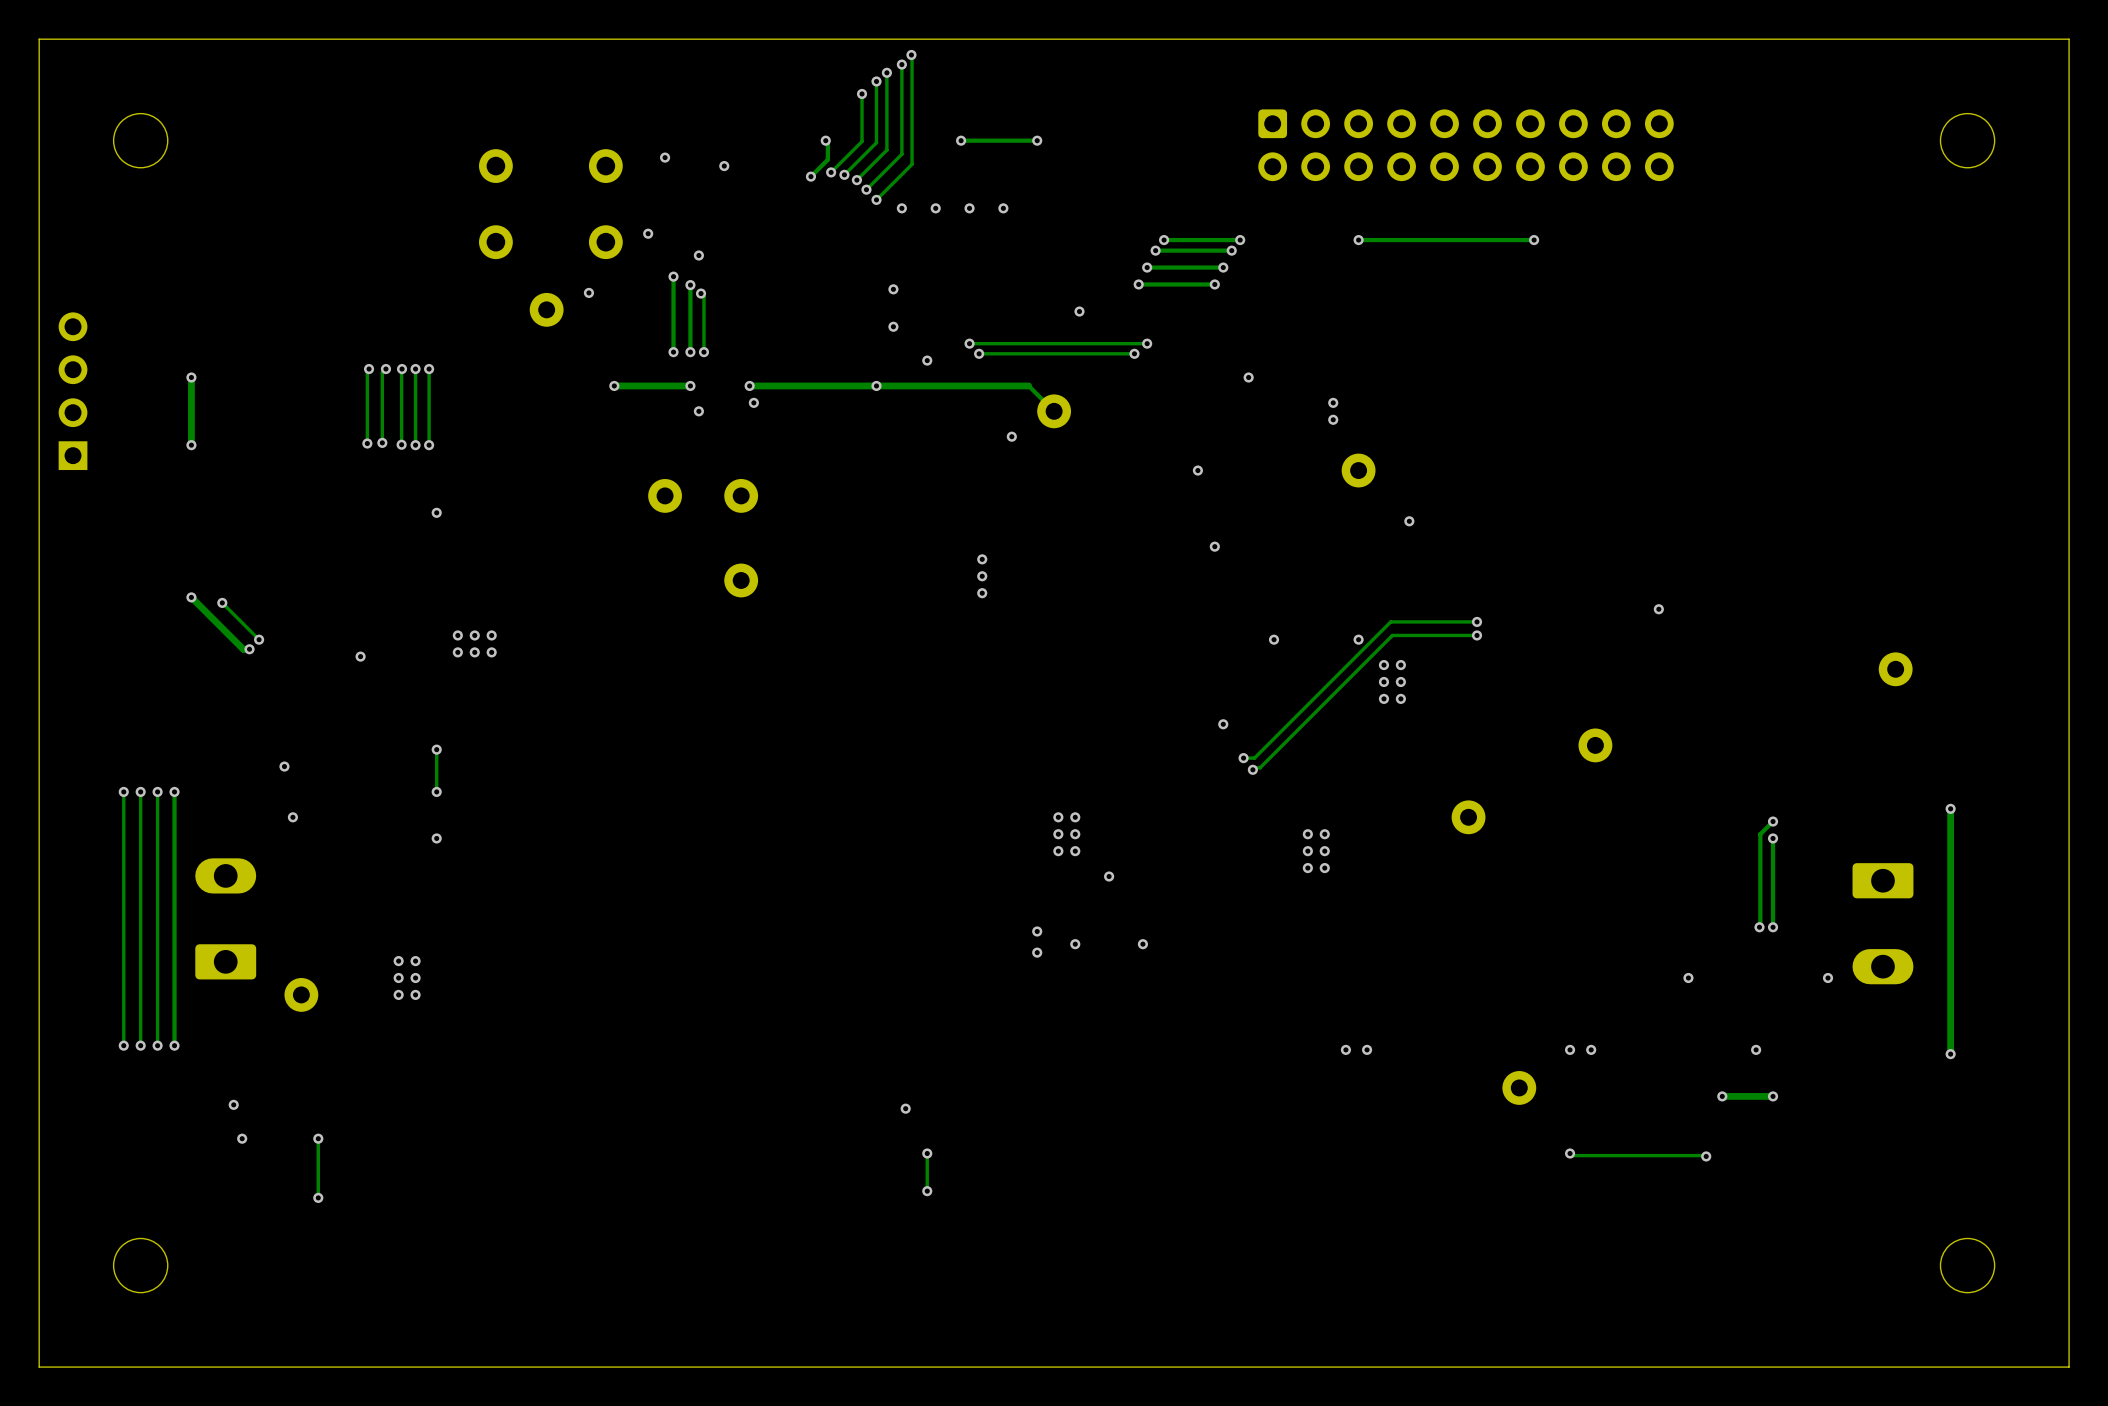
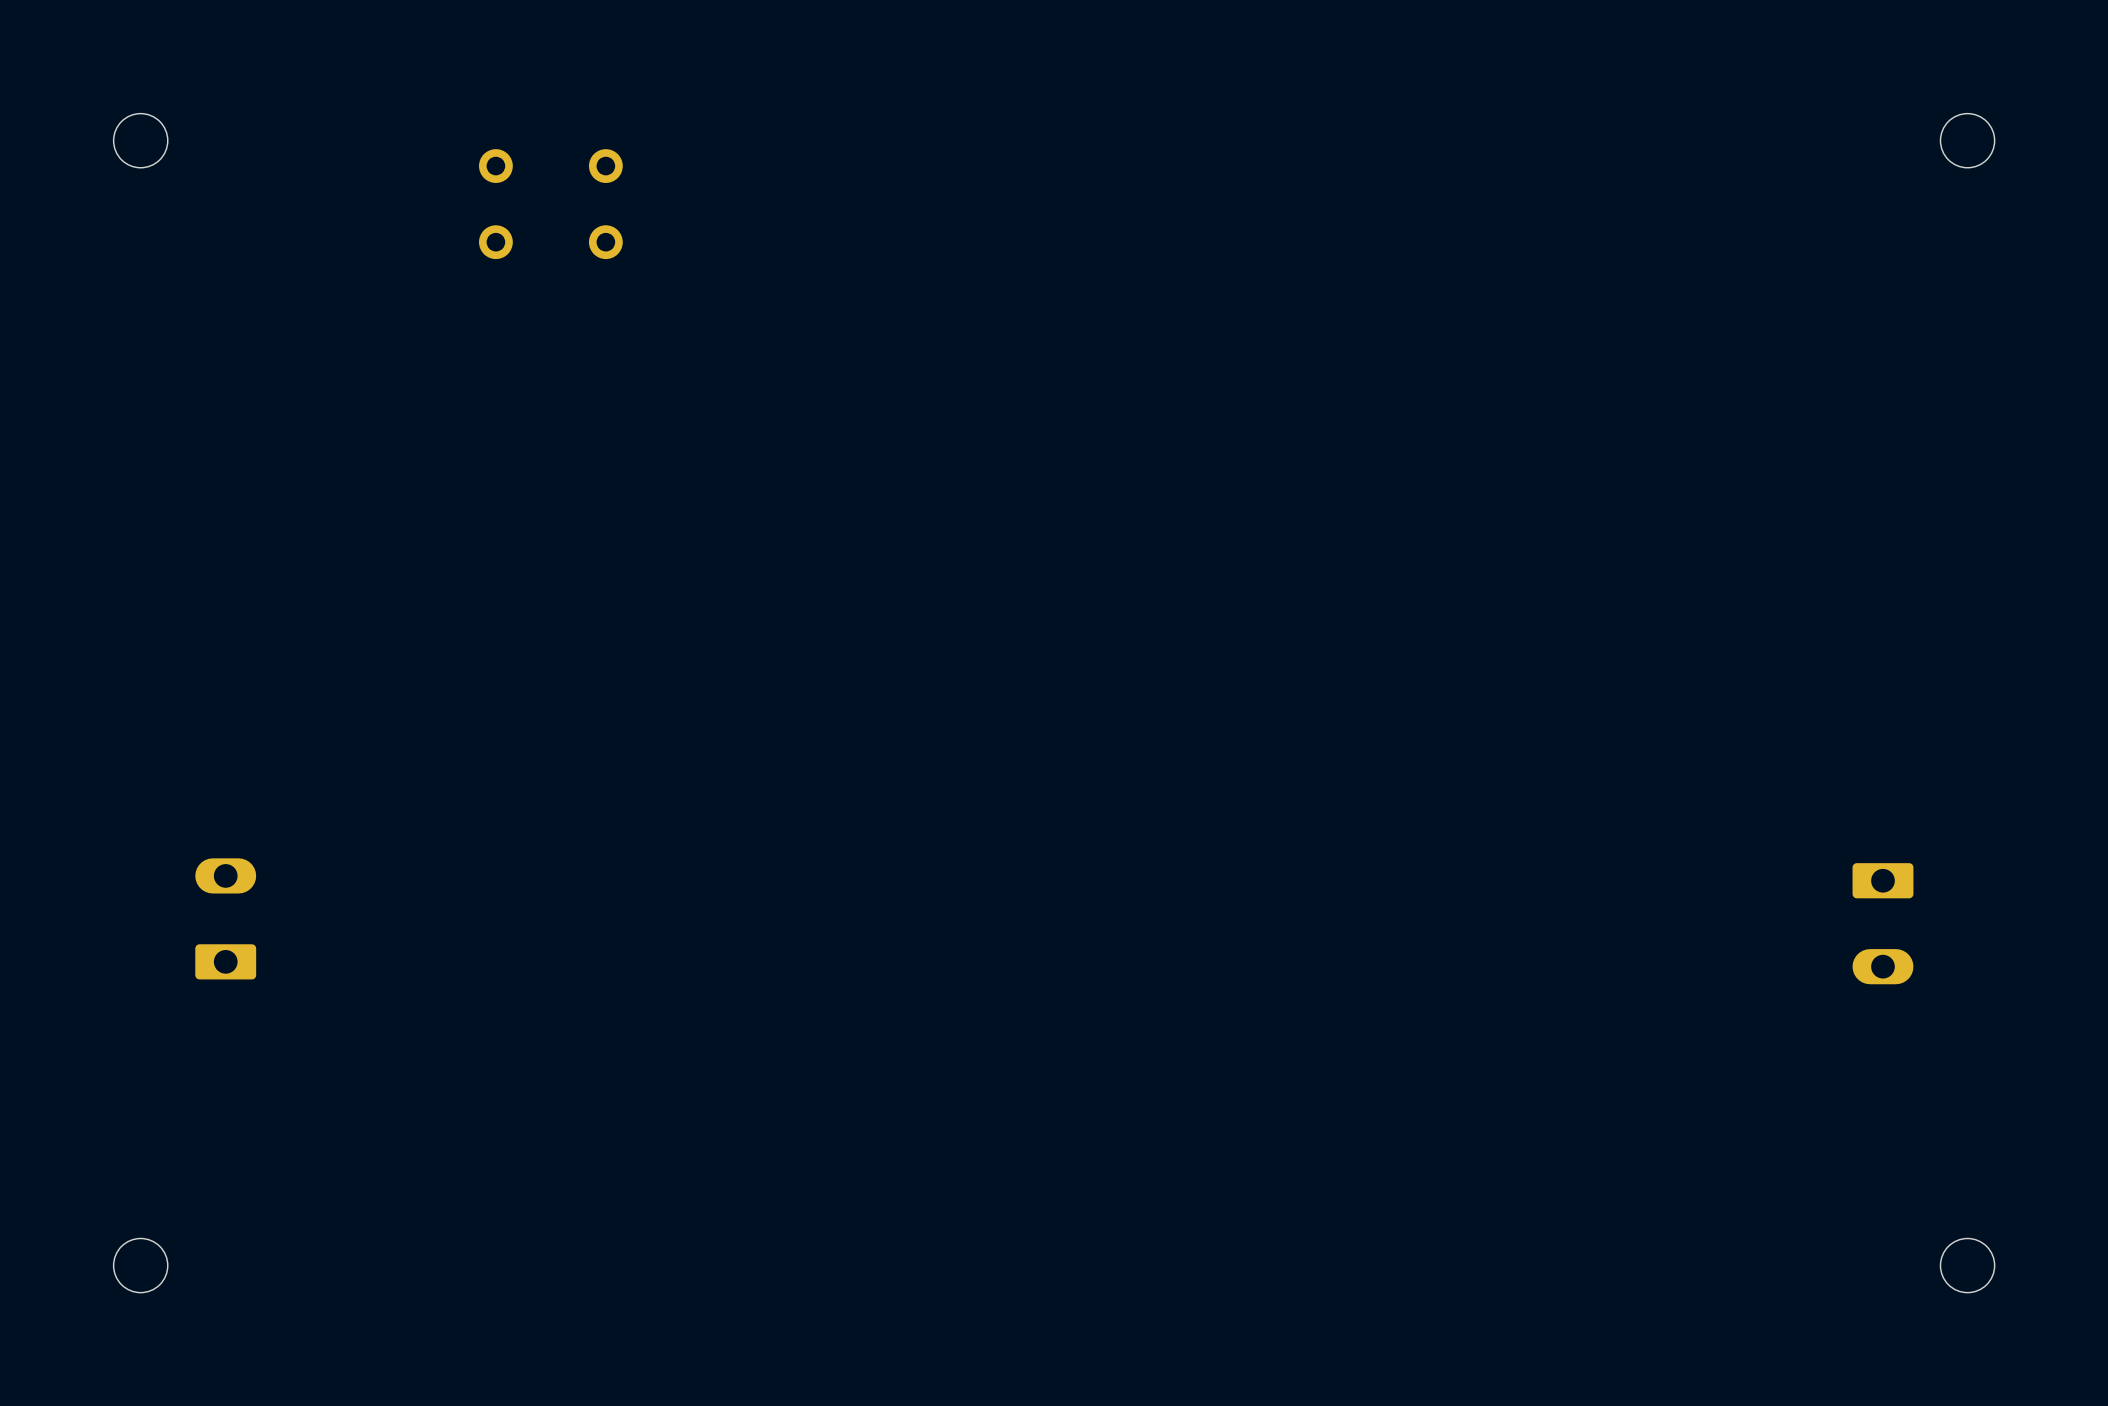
board edge: (2069, 39) (39, 39) (39, 1367) (2069, 1367) (2069, 39) -> none
track: (911, 54) (912, 164) (876, 199) -> none
via: (911, 54) -> none
track: (901, 64) (901, 154) (866, 189) -> none
via: (901, 64) -> none
via: (886, 72) -> none
track: (886, 73) (886, 150) (856, 180) -> none
track: (876, 81) (876, 142) (844, 174) -> none
via: (876, 81) -> none
track: (862, 93) (862, 141) (831, 172) -> none
via: (862, 93) -> none
track: (825, 140) (827, 142) (827, 159) (810, 176) -> none
via: (825, 140) -> none
via: (961, 140) -> none
track: (1037, 140) (961, 140) -> none
via: (1037, 140) -> none
part: (1466, 145) -> none
via: (665, 157) -> none
via: (724, 166) -> none
via: (831, 172) -> none
via: (844, 174) -> none
via: (810, 176) -> none
via: (856, 180) -> none
via: (866, 189) -> none
via: (876, 199) -> none
via: (901, 208) -> none
via: (935, 208) -> none
via: (969, 208) -> none
via: (1003, 208) -> none
via: (648, 233) -> none
via: (1164, 240) -> none
track: (1240, 240) (1164, 240) -> none
via: (1240, 240) -> none
via: (1358, 240) -> none
track: (1534, 240) (1358, 240) -> none
via: (1534, 240) -> none
via: (1155, 250) -> none
track: (1231, 250) (1155, 250) -> none
via: (1231, 250) -> none
via: (698, 255) -> none
via: (1147, 267) -> none
track: (1223, 267) (1147, 267) -> none
via: (1223, 267) -> none
track: (673, 276) (673, 352) -> none
via: (673, 276) -> none
via: (1138, 284) -> none
track: (1214, 284) (1138, 284) -> none
via: (1214, 284) -> none
track: (690, 285) (690, 352) -> none
via: (690, 285) -> none
via: (893, 289) -> none
via: (588, 292) -> none
track: (701, 293) (703, 296) (703, 352) -> none
via: (701, 293) -> none
part: (546, 309) -> none
via: (1079, 311) -> none
via: (893, 326) -> none
via: (969, 343) -> none
track: (1147, 343) (969, 343) -> none
via: (1147, 343) -> none
via: (673, 352) -> none
via: (690, 352) -> none
via: (703, 352) -> none
via: (979, 353) -> none
track: (1134, 353) (979, 353) -> none
via: (1134, 353) -> none
via: (927, 360) -> none
track: (369, 369) (367, 370) (367, 443) -> none
via: (369, 369) -> none
track: (385, 369) (382, 372) (382, 442) -> none
via: (385, 369) -> none
track: (402, 369) (401, 444) -> none
via: (402, 369) -> none
track: (415, 369) (415, 445) -> none
via: (415, 369) -> none
track: (429, 369) (429, 445) -> none
via: (429, 369) -> none
track: (191, 377) (191, 445) -> none
via: (191, 377) -> none
via: (1248, 377) -> none
via: (614, 385) -> none
track: (690, 385) (614, 385) -> none
via: (690, 385) -> none
track: (749, 385) (1028, 385) (1054, 411) -> none
via: (749, 385) -> none
via: (876, 385) -> none
part: (73, 391) -> none
via: (753, 402) -> none
via: (1333, 402) -> none
via: (698, 411) -> none
part: (1054, 411) -> none
via: (1333, 419) -> none
via: (1011, 436) -> none
via: (382, 442) -> none
via: (367, 443) -> none
via: (401, 444) -> none
via: (191, 445) -> none
via: (415, 445) -> none
via: (429, 445) -> none
via: (1197, 470) -> none
part: (1358, 470) -> none
part: (665, 495) -> none
part: (741, 495) -> none
via: (436, 512) -> none
via: (1409, 521) -> none
via: (1214, 546) -> none
via: (982, 559) -> none
via: (982, 576) -> none
part: (741, 580) -> none
via: (982, 593) -> none
track: (191, 597) (243, 649) (249, 649) -> none
via: (191, 597) -> none
track: (222, 602) (259, 639) -> none
via: (222, 602) -> none
via: (1658, 609) -> none
track: (1477, 621) (1390, 621) (1254, 758) (1243, 758) -> none
via: (1477, 621) -> none
via: (457, 635) -> none
via: (474, 635) -> none
via: (491, 635) -> none
track: (1477, 635) (1392, 635) (1260, 767) (1252, 769) -> none
via: (1477, 635) -> none
via: (259, 639) -> none
via: (1274, 639) -> none
via: (1358, 639) -> none
via: (249, 649) -> none
via: (457, 652) -> none
via: (474, 652) -> none
via: (491, 652) -> none
via: (360, 656) -> none
via: (1383, 665) -> none
via: (1400, 665) -> none
part: (1895, 669) -> none
via: (1383, 681) -> none
via: (1400, 681) -> none
via: (1383, 698) -> none
via: (1400, 698) -> none
via: (1223, 724) -> none
part: (1595, 745) -> none
track: (436, 749) (436, 791) -> none
via: (436, 749) -> none
via: (1243, 758) -> none
via: (284, 766) -> none
via: (1252, 769) -> none
track: (123, 791) (123, 1045) -> none
via: (123, 791) -> none
track: (140, 791) (140, 1045) -> none
via: (140, 791) -> none
track: (157, 791) (157, 1045) -> none
via: (157, 791) -> none
track: (174, 791) (174, 1045) -> none
via: (174, 791) -> none
via: (436, 791) -> none
track: (1950, 808) (1950, 1054) -> none
via: (1950, 808) -> none
via: (292, 817) -> none
via: (1058, 817) -> none
via: (1075, 817) -> none
part: (1468, 817) -> none
track: (1773, 821) (1760, 834) (1759, 927) -> none
via: (1773, 821) -> none
via: (1058, 834) -> none
via: (1075, 834) -> none
via: (1307, 834) -> none
via: (1324, 834) -> none
via: (436, 838) -> none
track: (1773, 838) (1773, 927) -> none
via: (1773, 838) -> none
via: (1058, 851) -> none
via: (1075, 851) -> none
via: (1307, 851) -> none
via: (1324, 851) -> none
via: (1307, 868) -> none
via: (1324, 868) -> none
via: (1109, 876) -> none
via: (1759, 927) -> none
via: (1773, 927) -> none
via: (1037, 931) -> none
via: (1075, 944) -> none
via: (1142, 944) -> none
via: (1037, 952) -> none
via: (398, 961) -> none
via: (415, 961) -> none
via: (398, 978) -> none
via: (415, 978) -> none
via: (1688, 978) -> none
via: (1828, 978) -> none
part: (301, 994) -> none
via: (398, 994) -> none
via: (415, 994) -> none
via: (123, 1045) -> none
via: (140, 1045) -> none
via: (157, 1045) -> none
via: (174, 1045) -> none
via: (1345, 1049) -> none
via: (1367, 1049) -> none
via: (1570, 1049) -> none
via: (1591, 1049) -> none
via: (1756, 1049) -> none
via: (1950, 1054) -> none
part: (1519, 1087) -> none
via: (1722, 1096) -> none
track: (1773, 1096) (1722, 1096) -> none
via: (1773, 1096) -> none
via: (233, 1104) -> none
via: (905, 1108) -> none
via: (242, 1138) -> none
track: (318, 1138) (318, 1197) -> none
via: (318, 1138) -> none
track: (927, 1153) (927, 1191) -> none
via: (927, 1153) -> none
track: (1570, 1153) (1572, 1155) (1706, 1156) -> none
via: (1570, 1153) -> none
via: (1706, 1156) -> none
via: (927, 1191) -> none
via: (318, 1197) -> none

